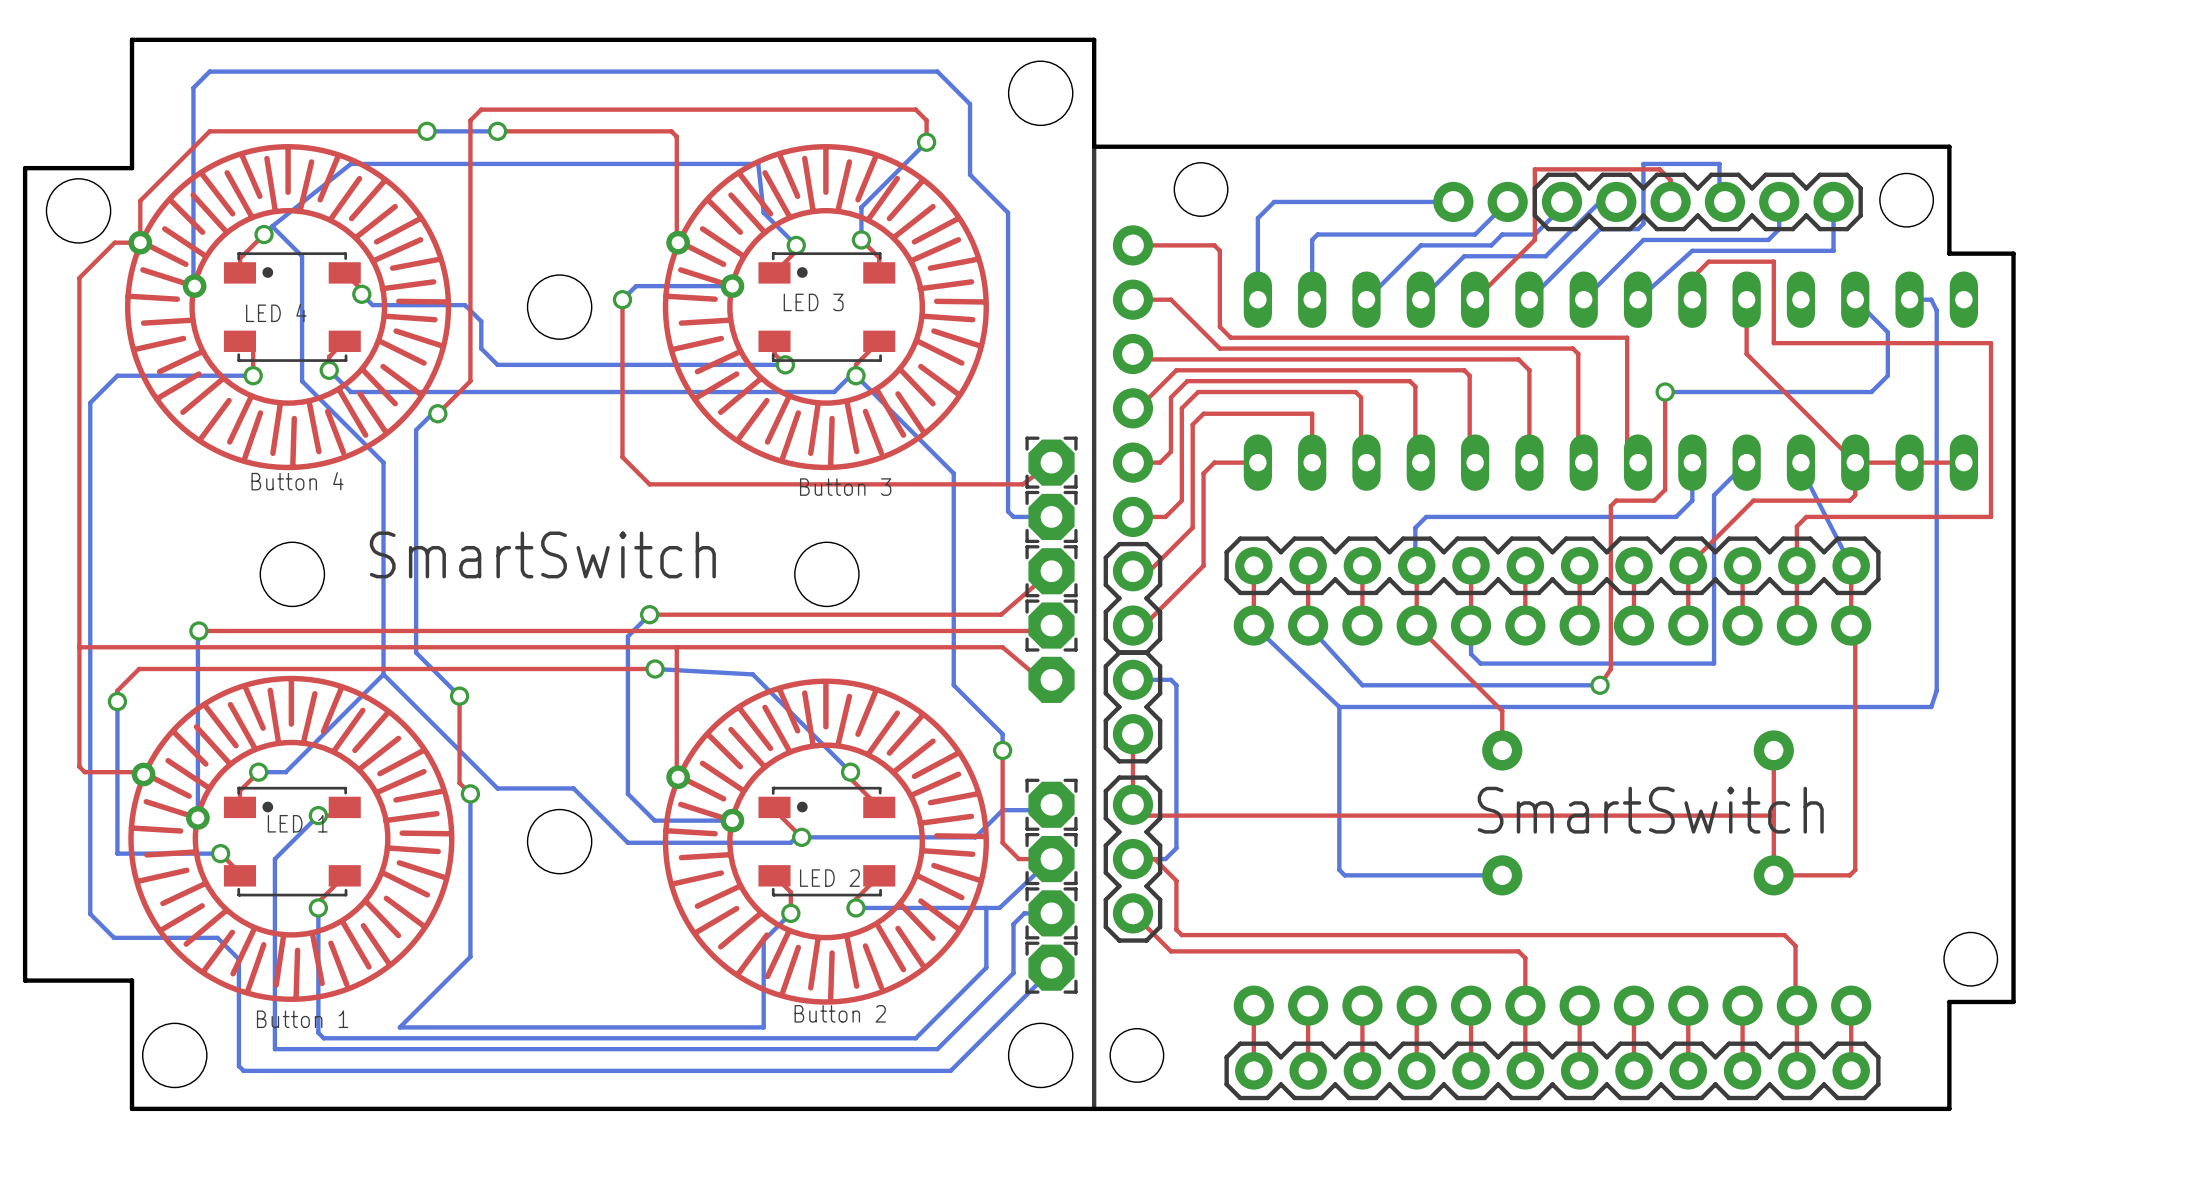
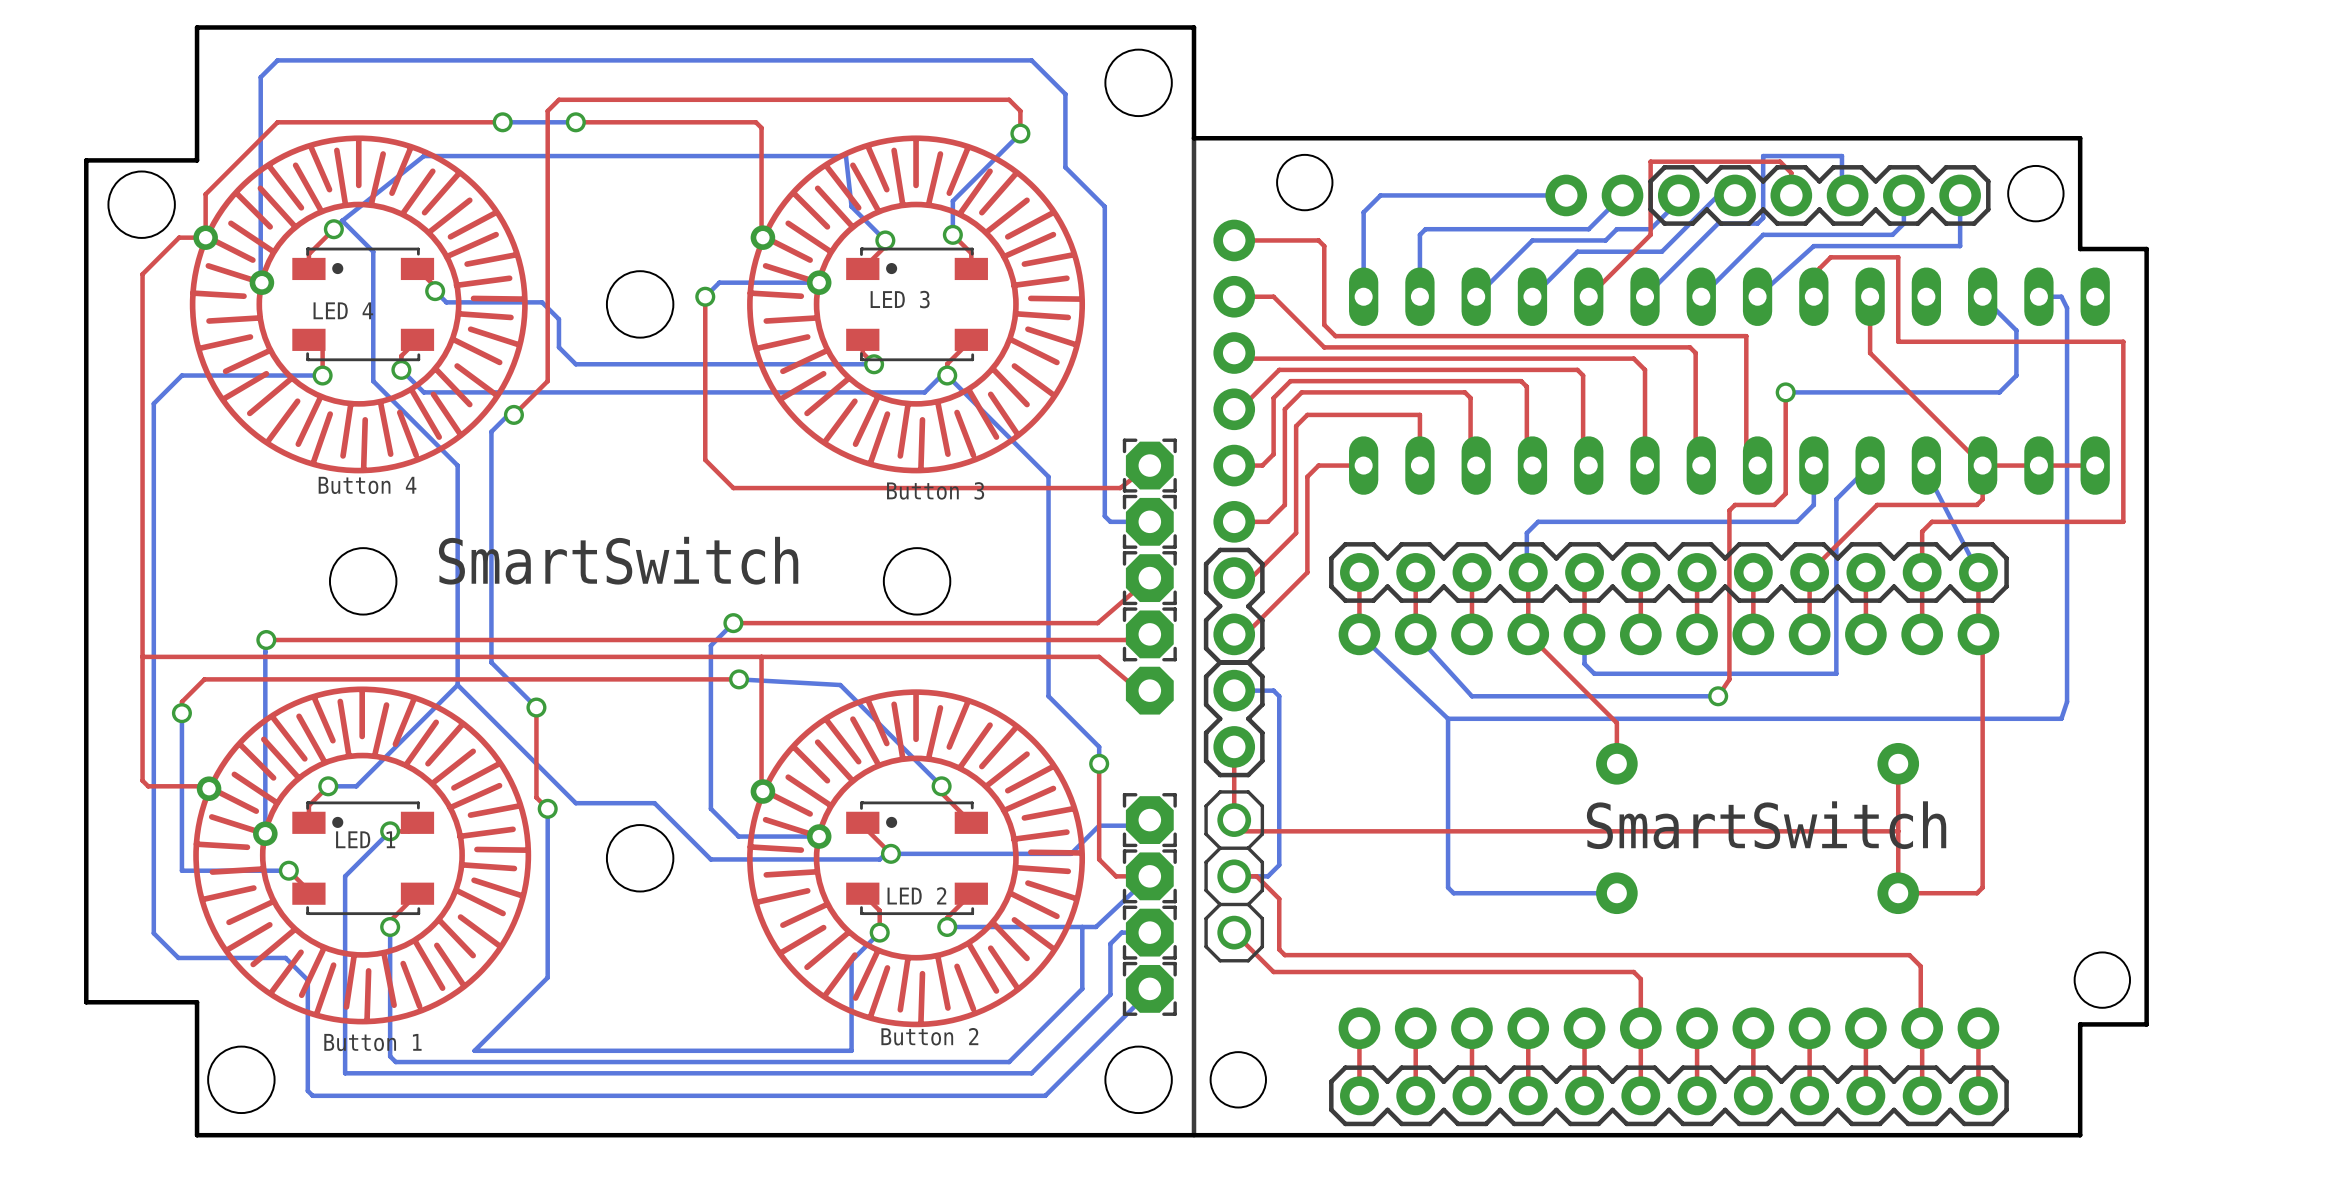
part footprint: [1103, 775, 1163, 943] -> [1204, 790, 1265, 963]

